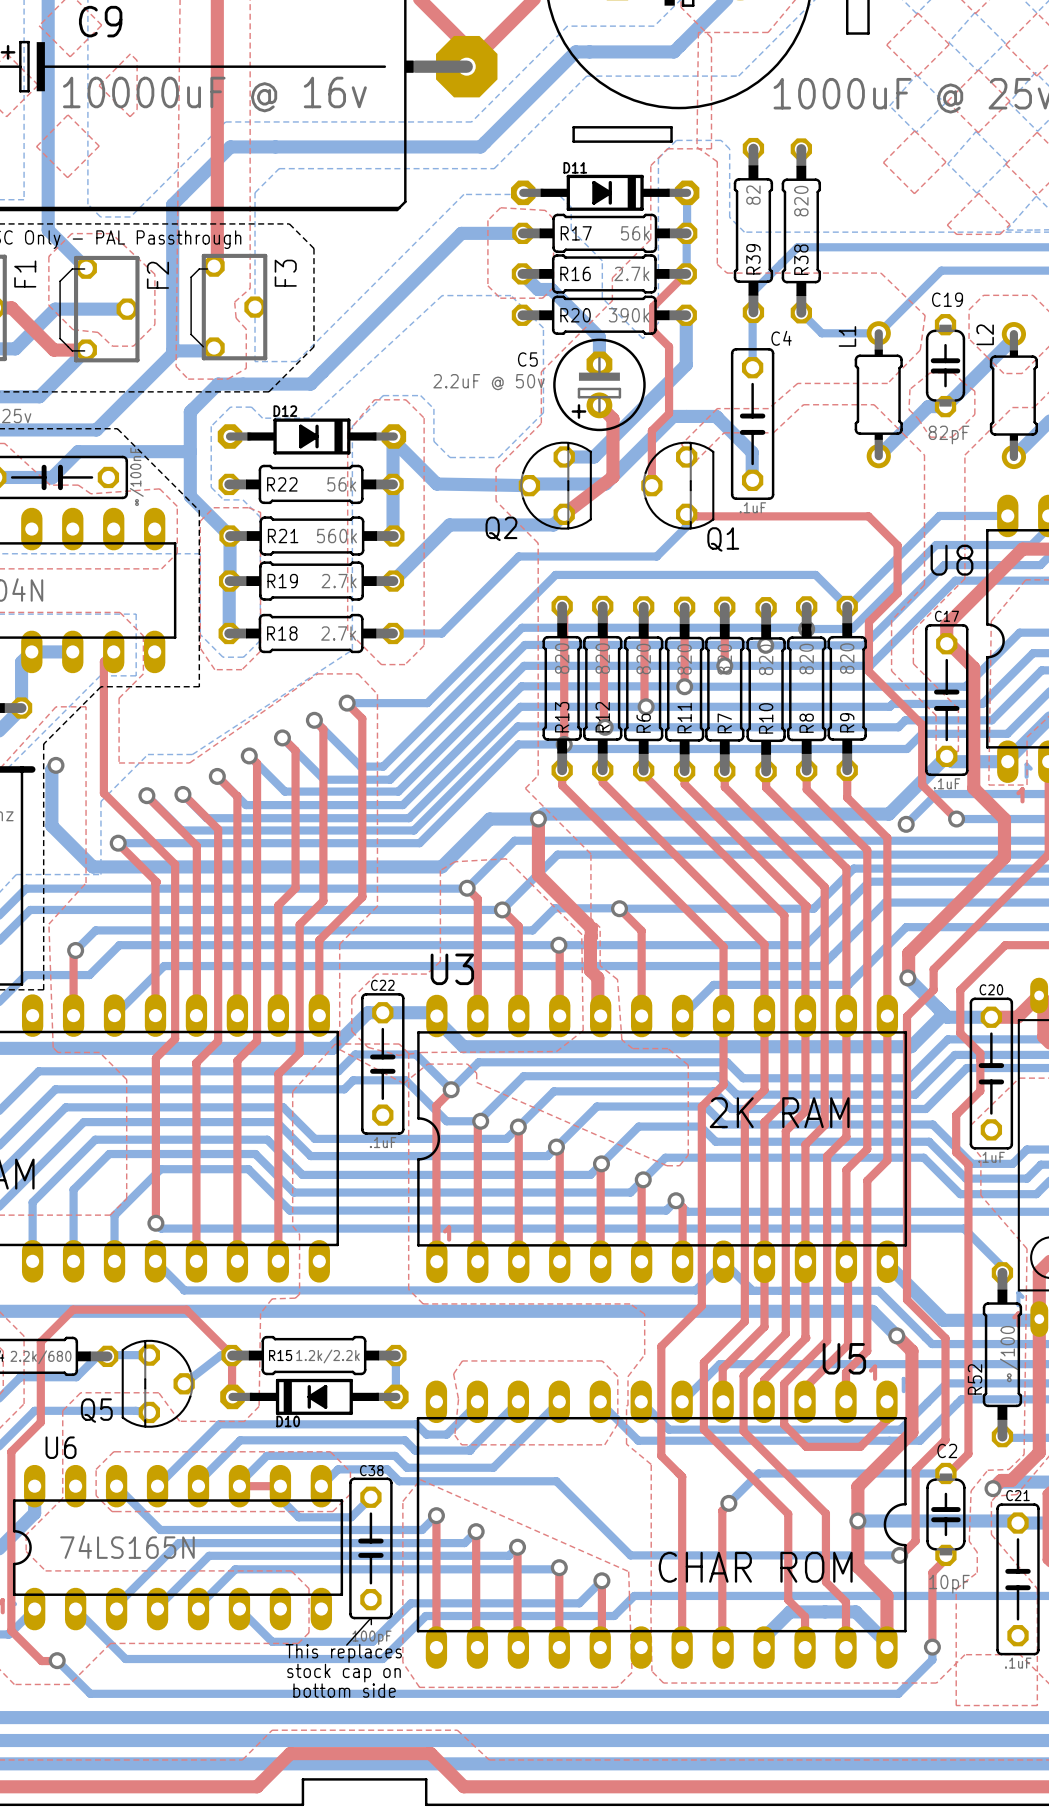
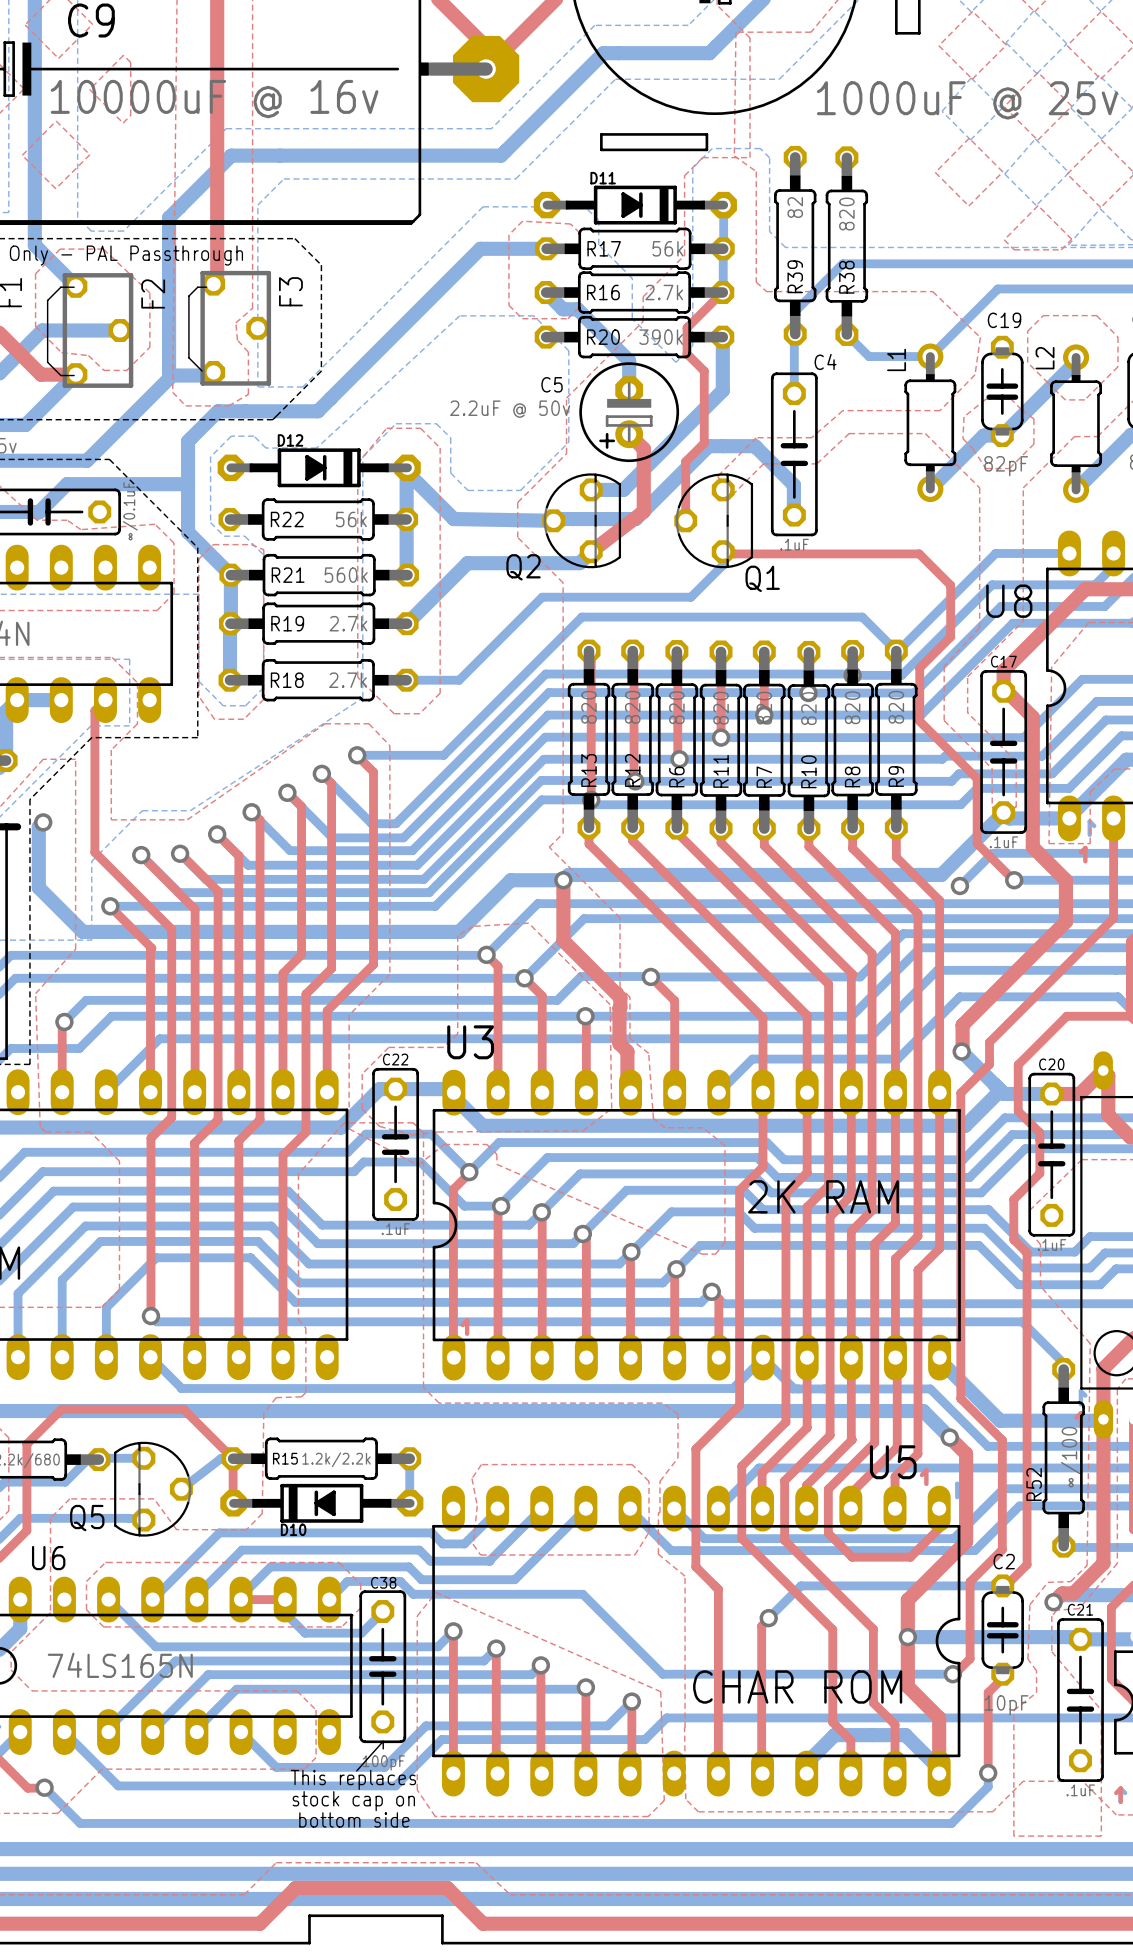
part value: ∞/100nF (136, 476) -> ∞/0.1uF (130, 511)

